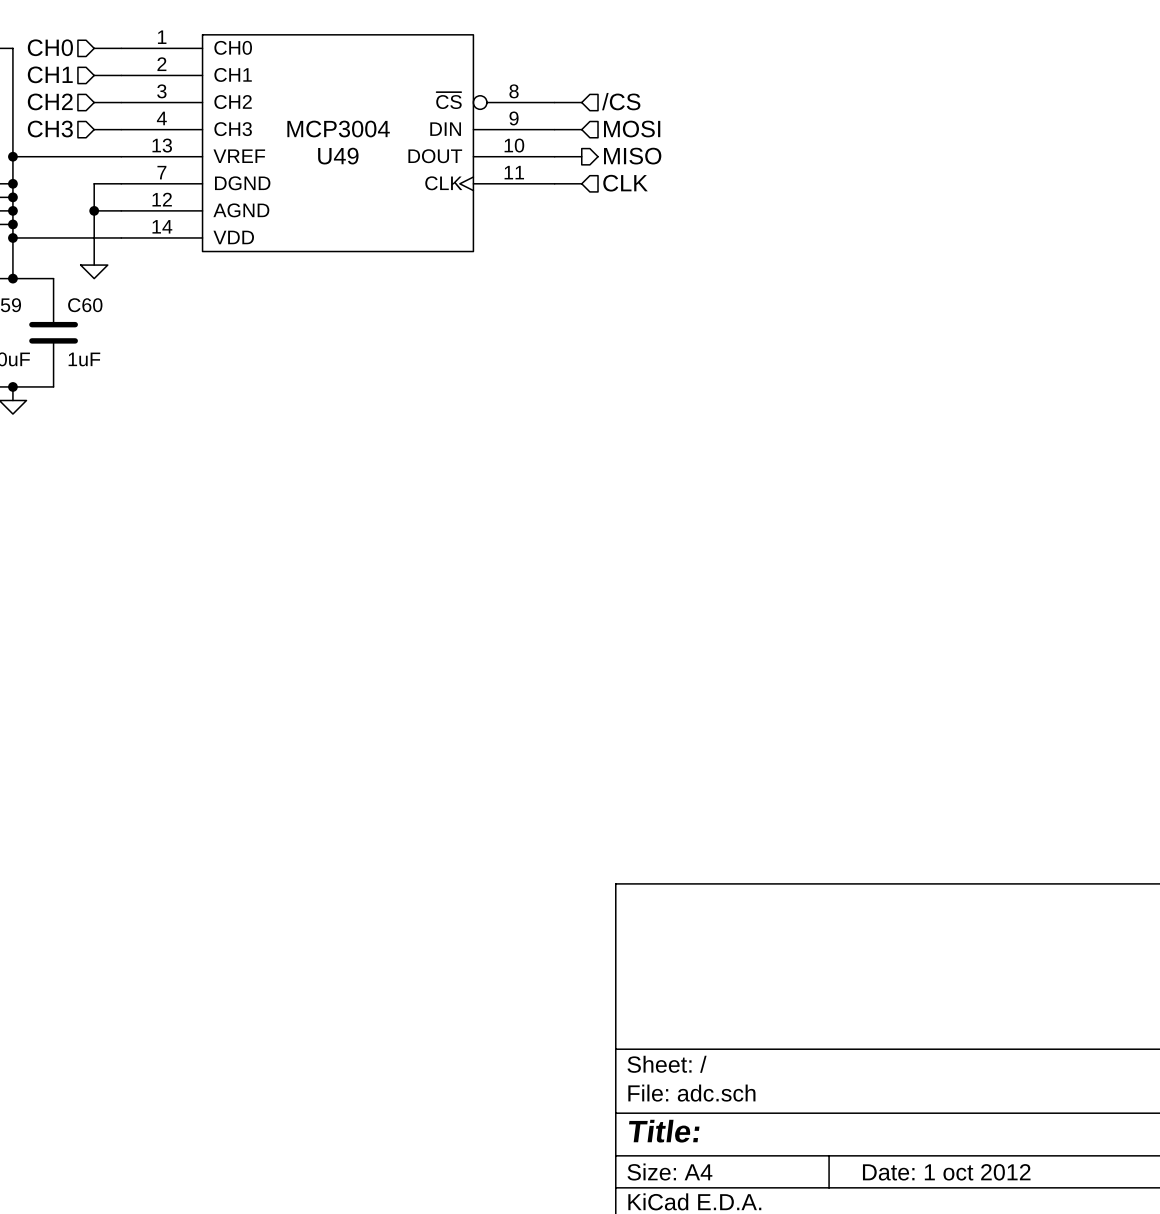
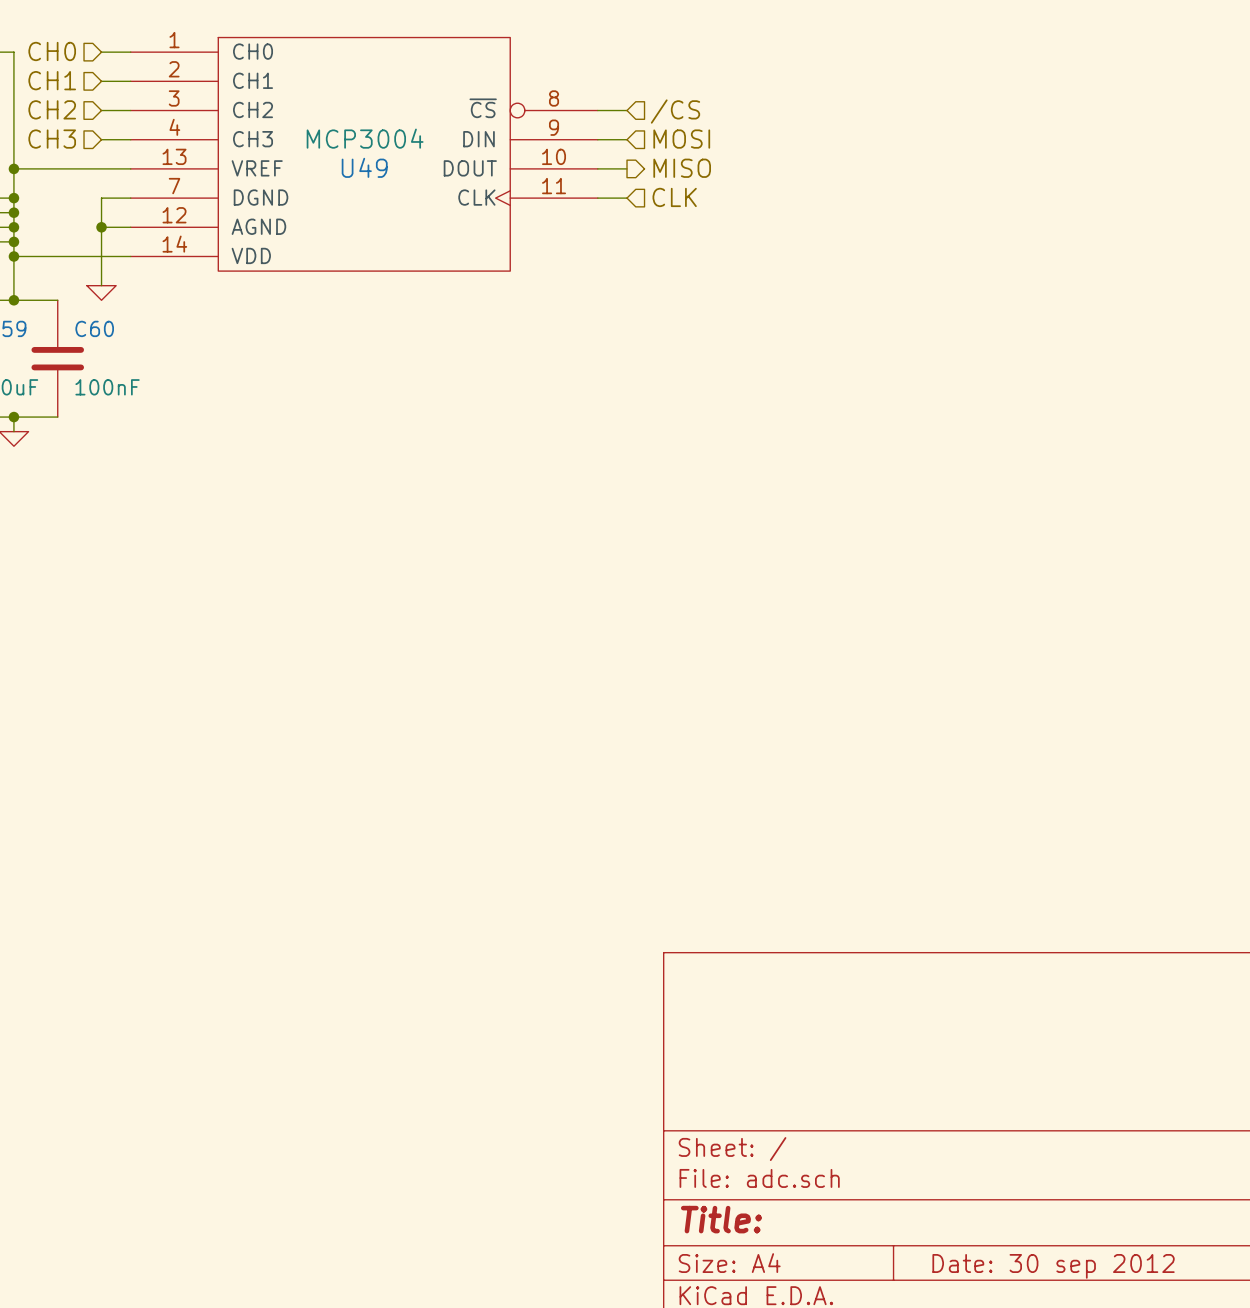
C60 value: 1uF (84, 359) -> 100nF (107, 387)
title block: Date: 1 oct 2012 (946, 1172) -> Date: 30 sep 2012 (1053, 1266)

